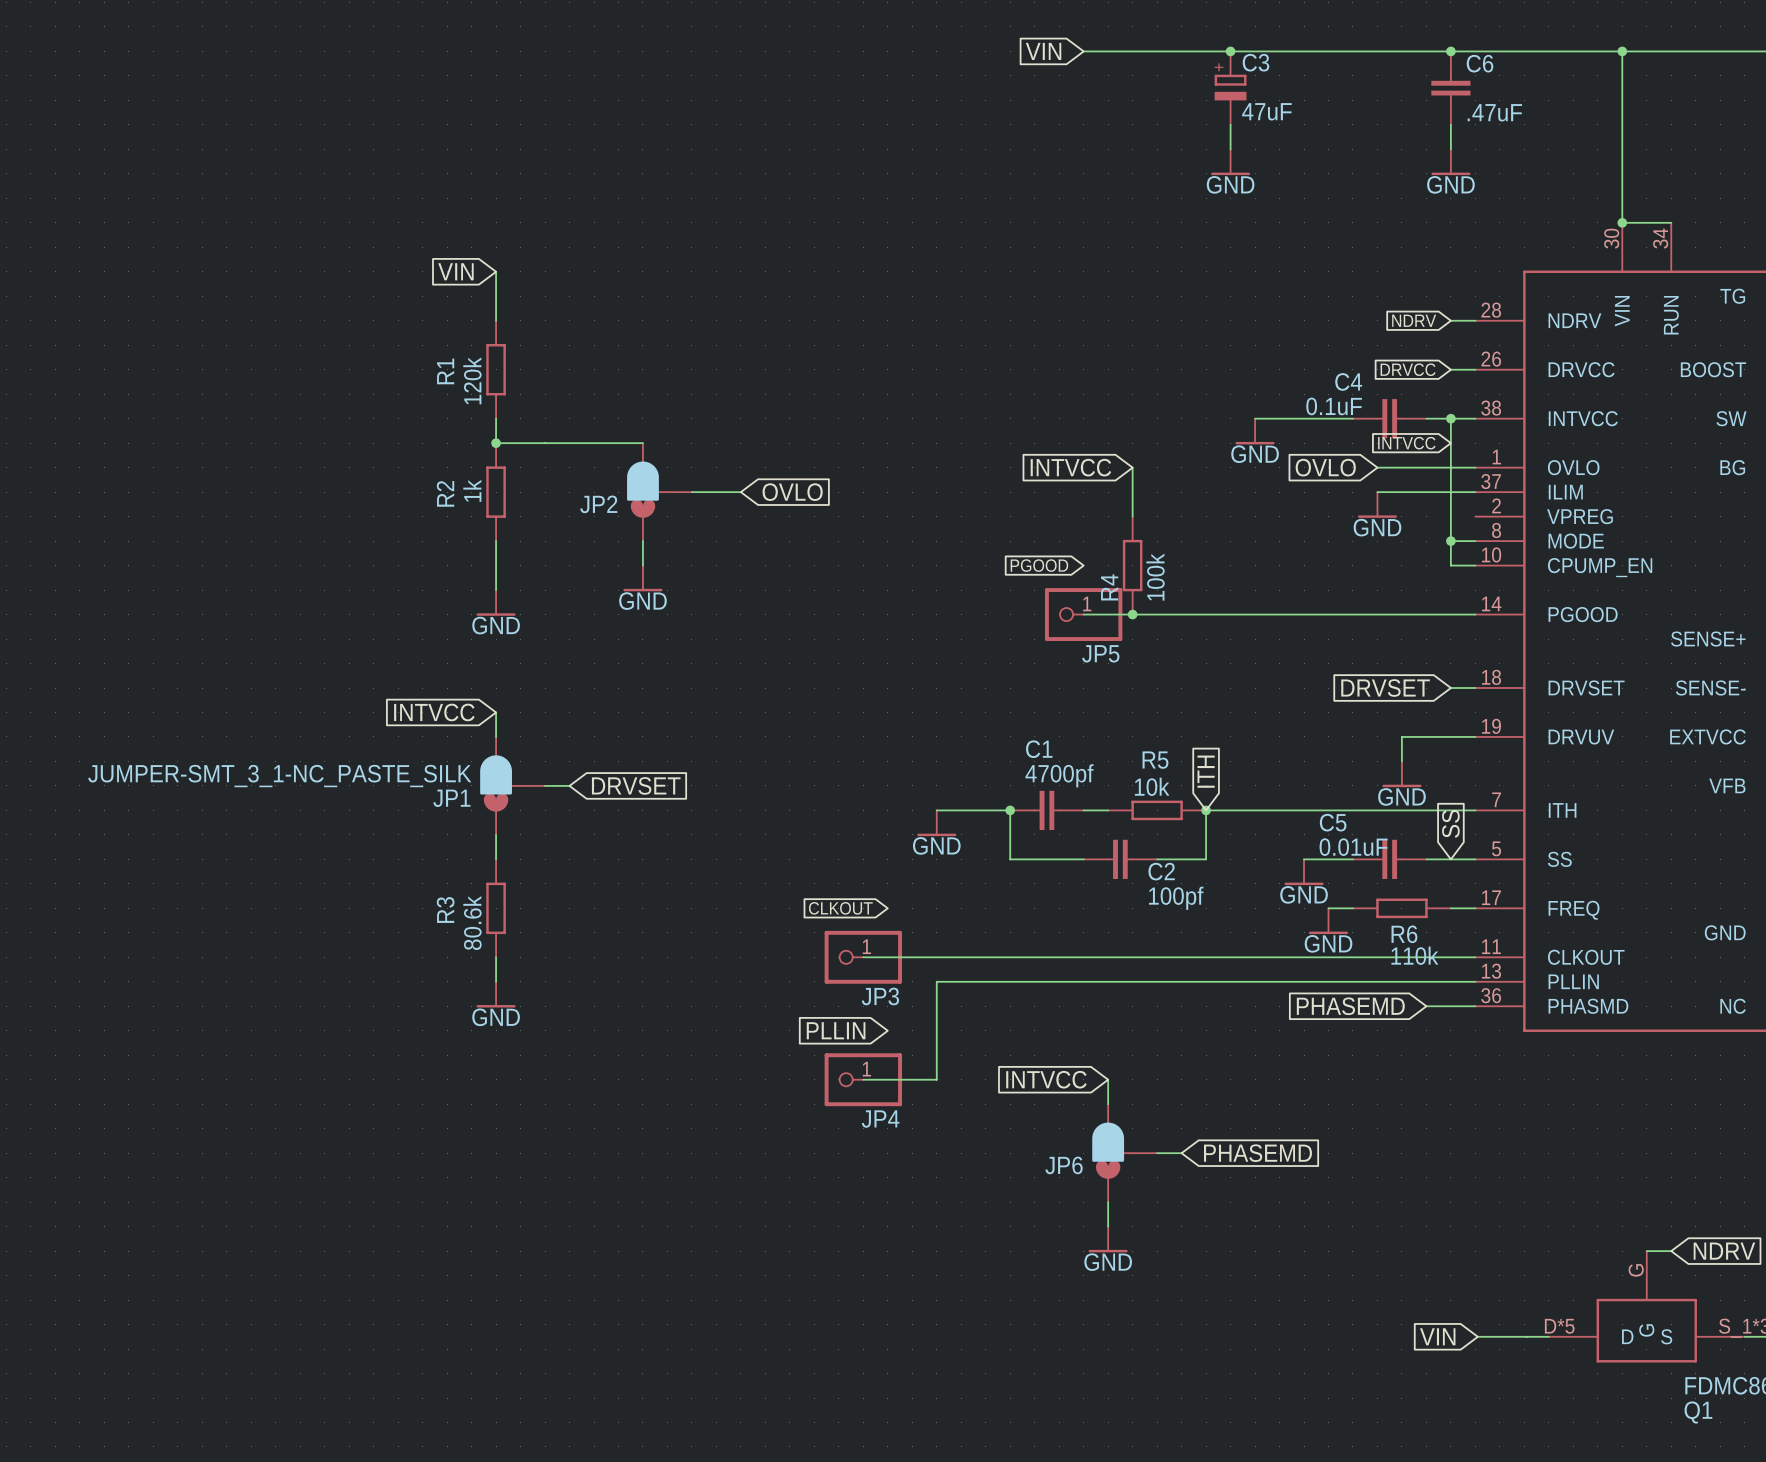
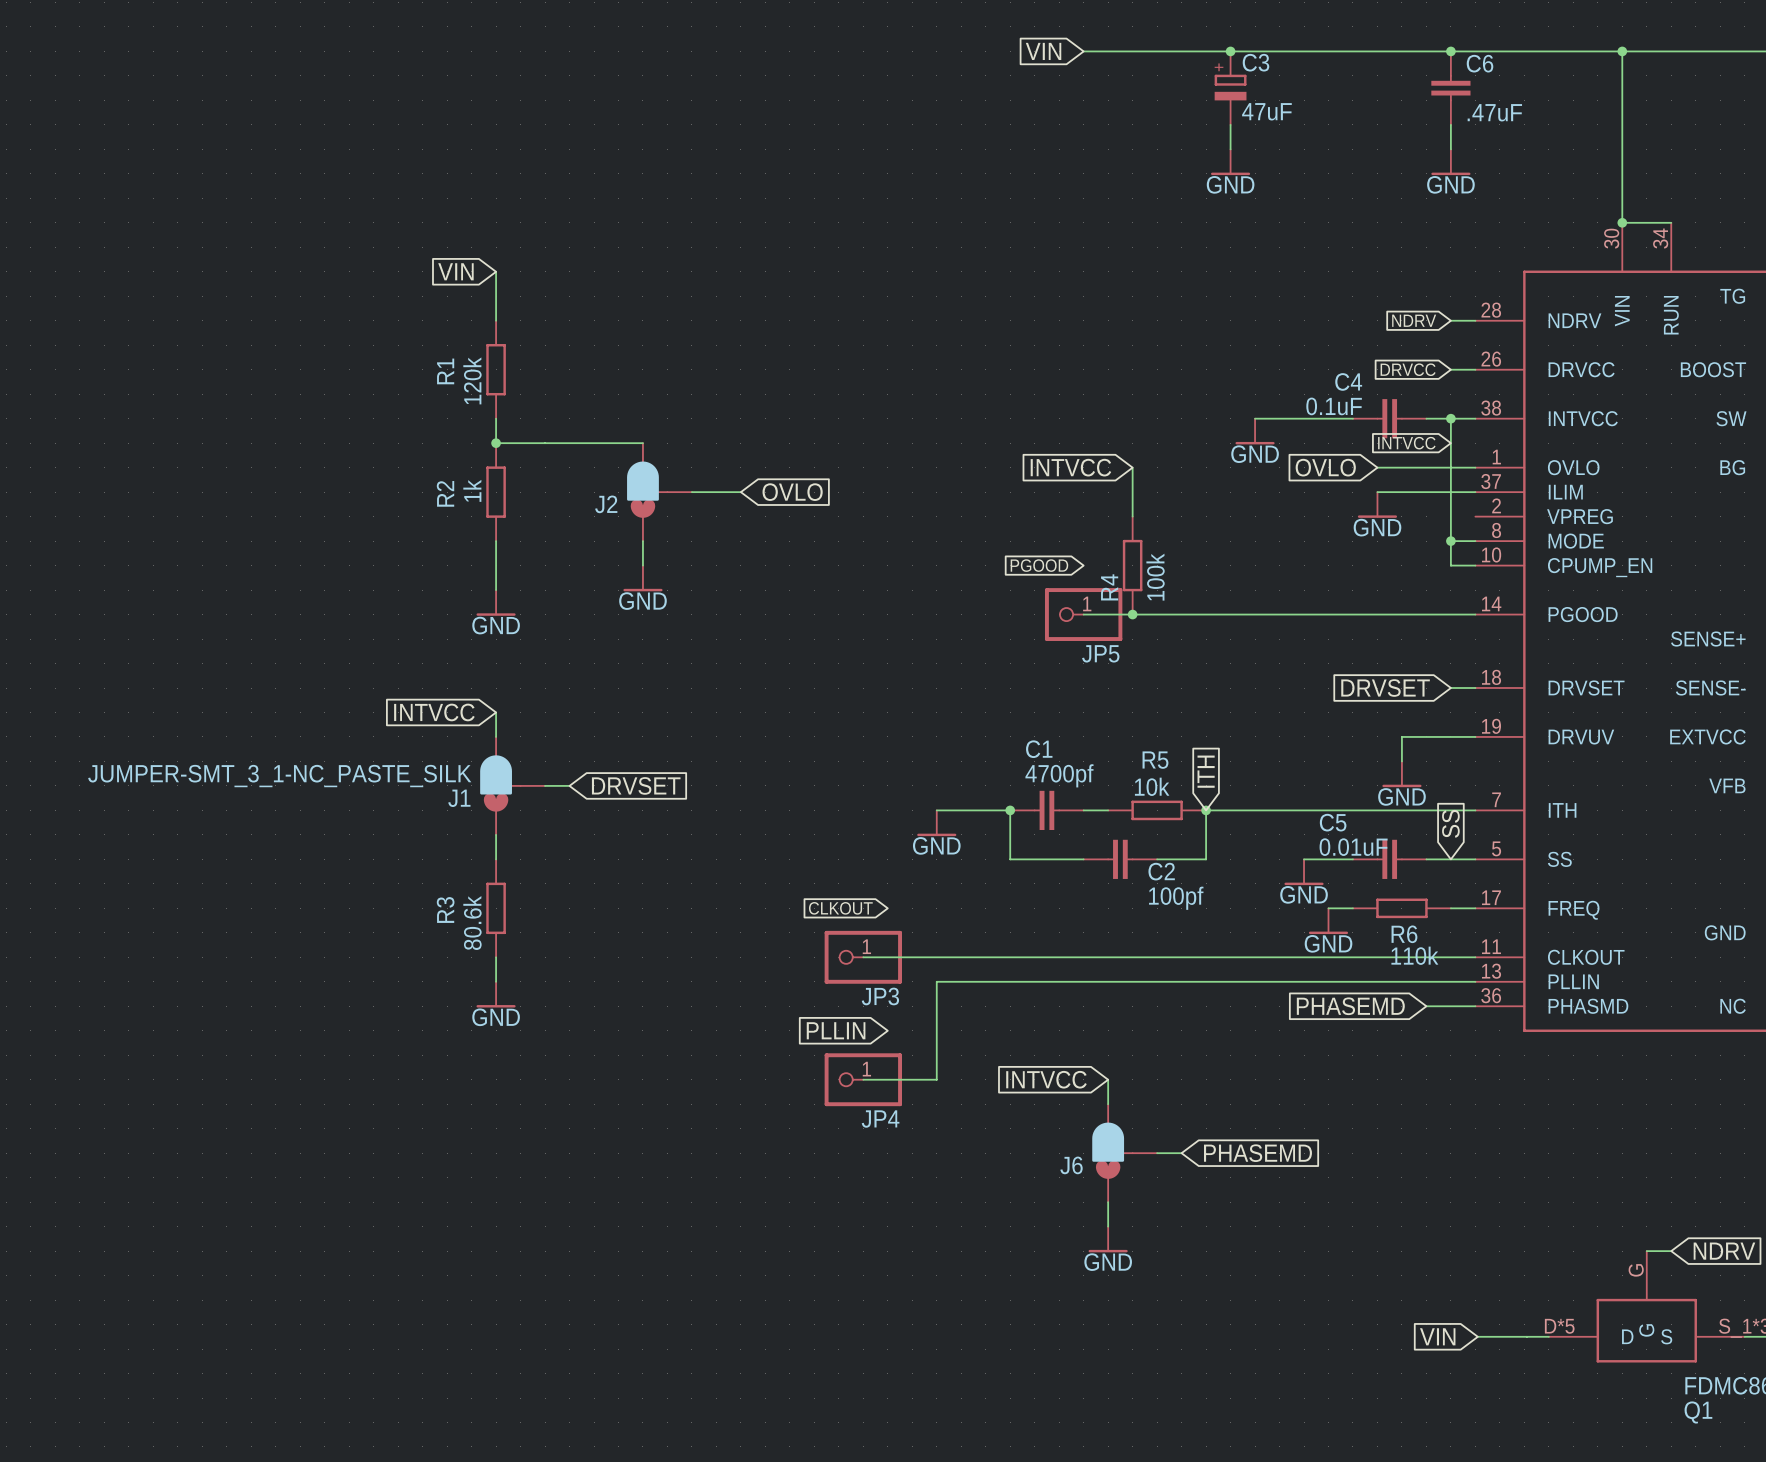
JP2 name: JP2 (598, 504) -> J2 (606, 504)
JP1 name: JP1 (451, 798) -> J1 (459, 798)
JP6 name: JP6 (1064, 1165) -> J6 (1071, 1165)

